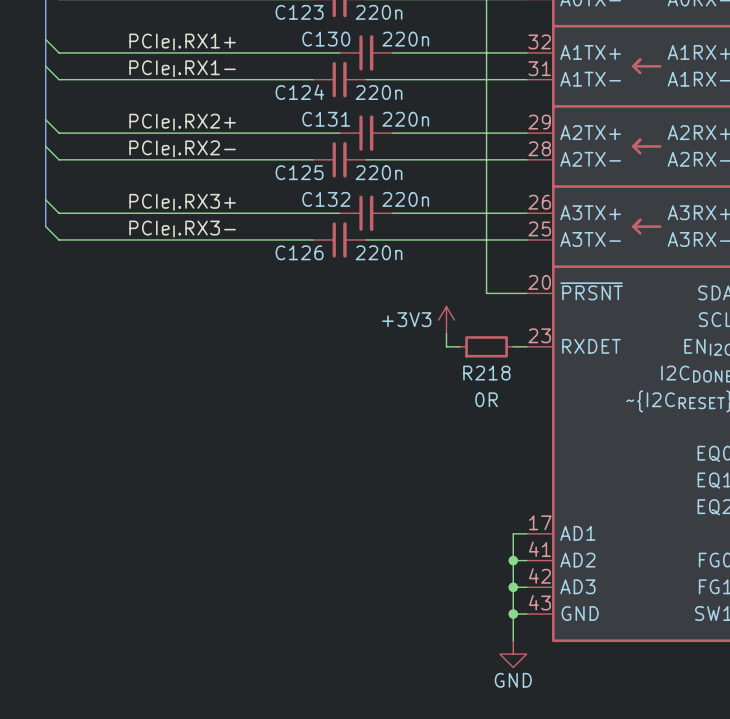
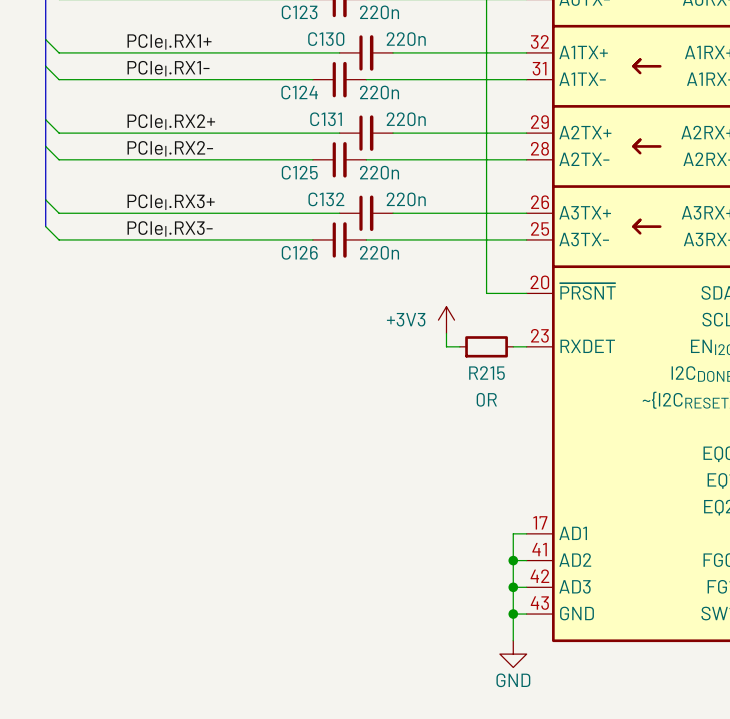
R218 name: R218 (486, 373) -> R215 (486, 373)

